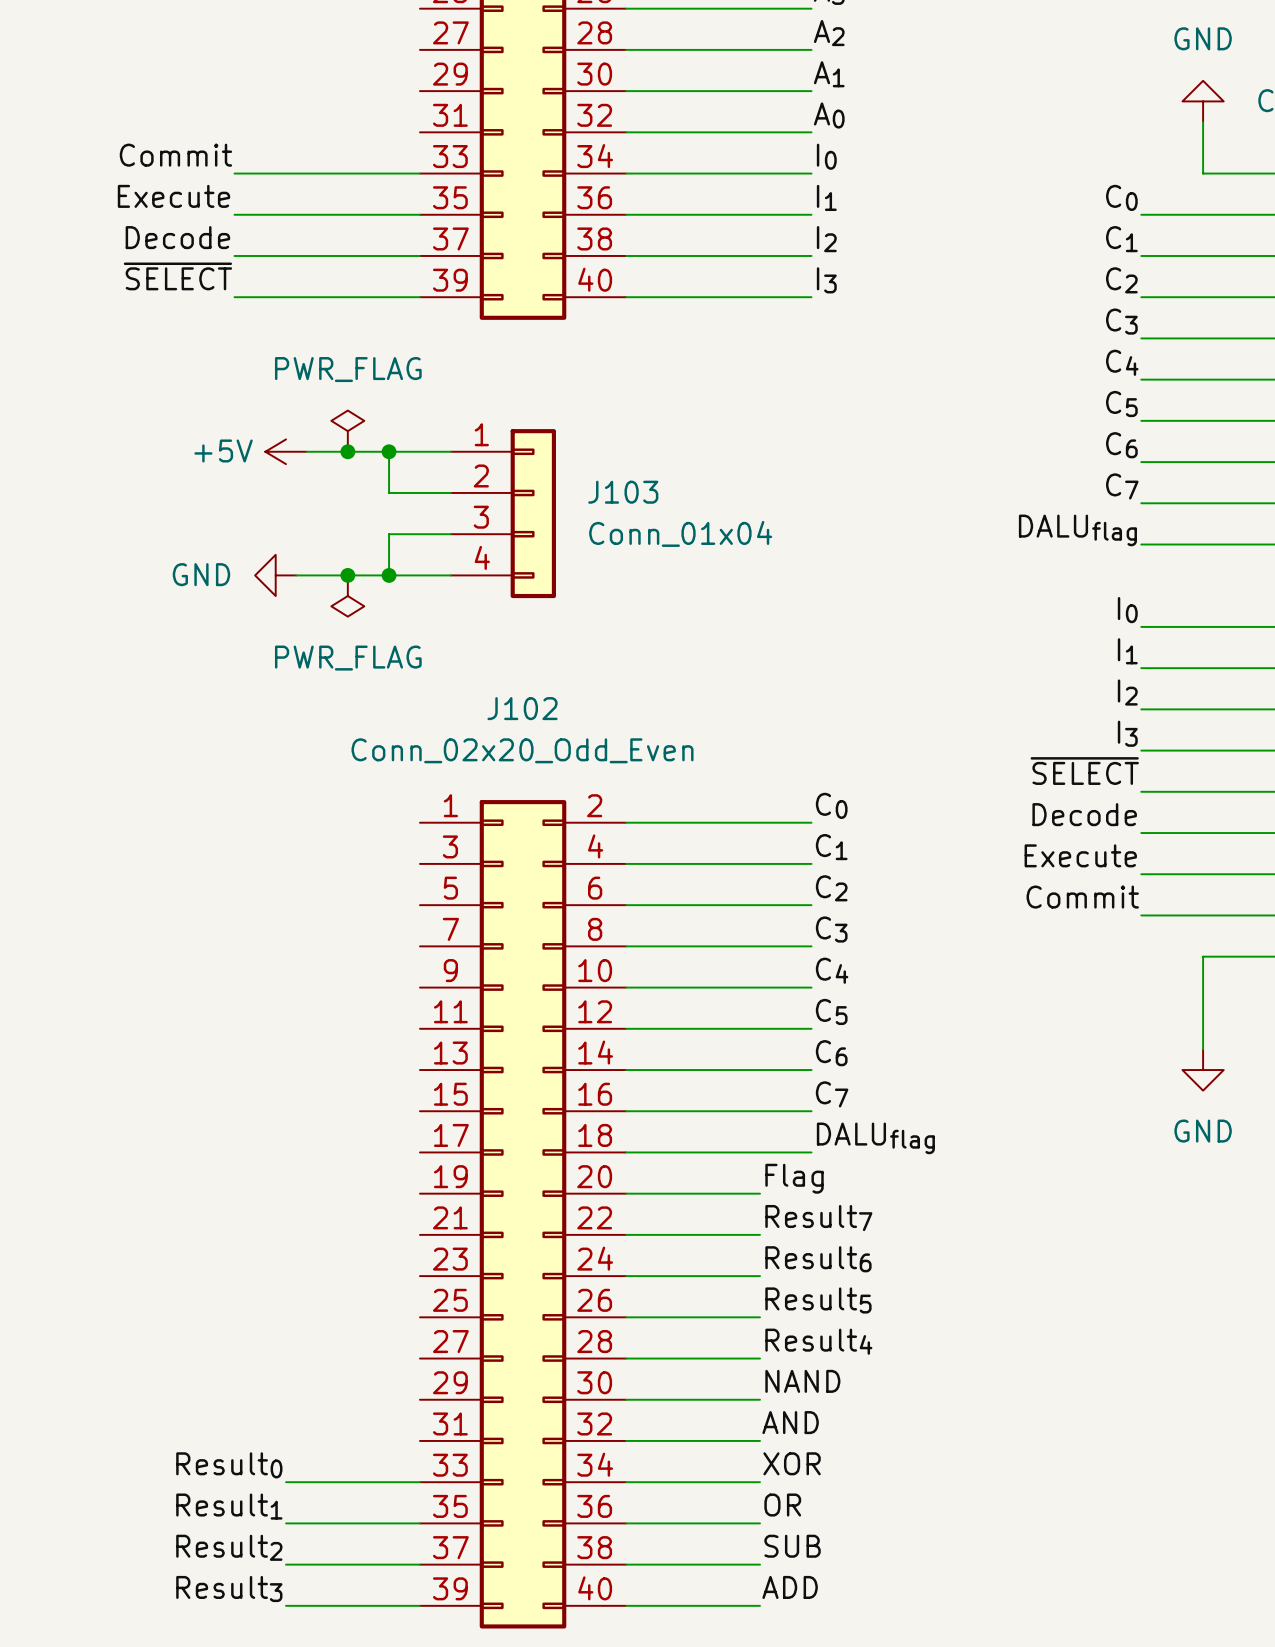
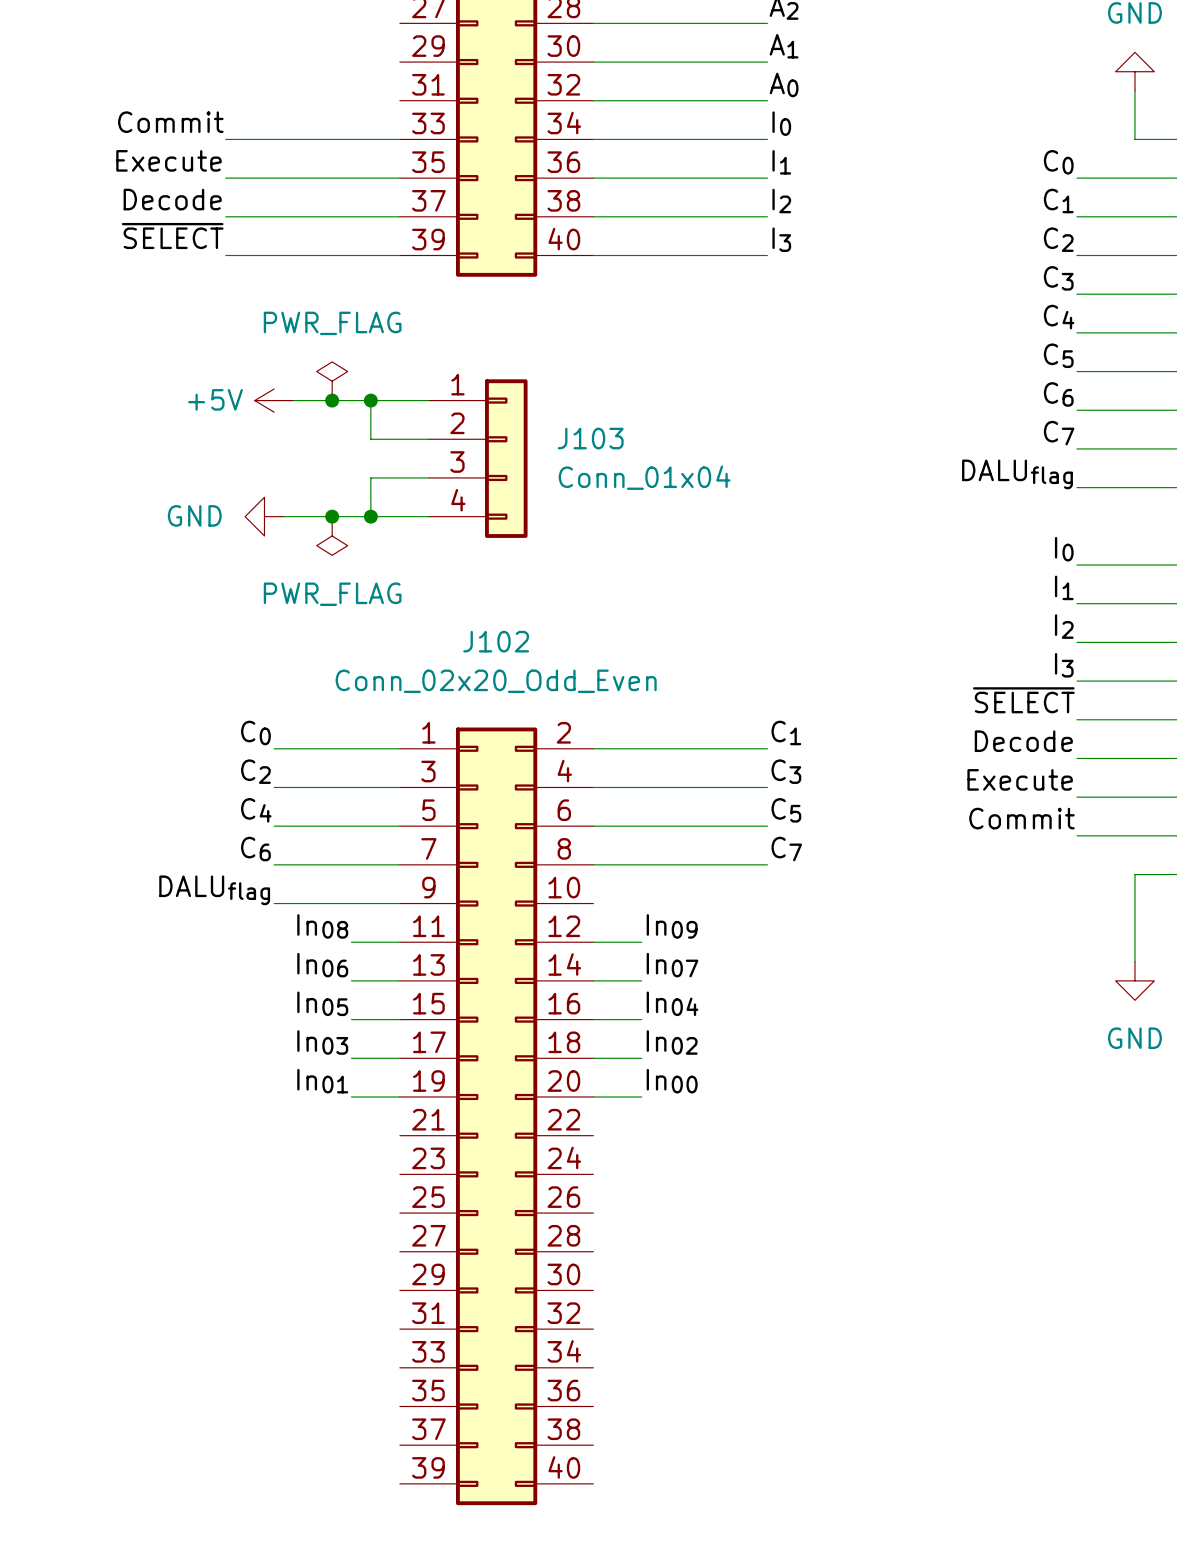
label: none -> C0 (255, 732)
label: C0 (831, 805) -> C1 (786, 732)
wire: none -> (274, 748) (399, 748)
label: none -> C2 (255, 771)
label: C1 (831, 847) -> C3 (786, 771)
wire: none -> (274, 787) (399, 787)
label: none -> C4 (256, 810)
label: C2 (831, 888) -> C5 (786, 810)
wire: none -> (274, 826) (399, 826)
label: none -> C6 (255, 849)
label: C3 (831, 929) -> C7 (786, 849)
label: C4 (832, 970) -> none
label: none -> DALUflag (214, 890)
wire: (626, 987) (811, 987) -> none
label: none -> In08 (322, 926)
label: none -> In09 (672, 926)
label: C5 (831, 1011) -> none
wire: none -> (351, 942) (399, 942)
wire: (677, 1028) (811, 1028) -> (274, 864) (399, 864)
label: none -> In06 (322, 965)
label: C6 (831, 1053) -> none
wire: none -> (351, 980) (399, 980)
wire: (677, 1070) (811, 1070) -> (274, 903) (399, 903)
label: none -> In05 (322, 1003)
label: none -> In04 (672, 1003)
label: C7 (832, 1094) -> In07 (672, 965)
wire: none -> (351, 1019) (399, 1019)
wire: (677, 1111) (811, 1111) -> none
label: none -> In03 (322, 1042)
label: none -> In02 (672, 1042)
label: DALUflag (875, 1138) -> none
wire: none -> (351, 1058) (399, 1058)
wire: (677, 1152) (811, 1152) -> none
label: none -> In01 (322, 1081)
label: none -> In00 (672, 1081)
label: Flag (794, 1178) -> none
wire: none -> (351, 1096) (399, 1096)
wire: (677, 1193) (760, 1193) -> none
label: Result7 (818, 1218) -> none
wire: (626, 1234) (760, 1234) -> none
label: Result6 (818, 1259) -> none
wire: (626, 1276) (760, 1276) -> none
label: Result5 (818, 1300) -> none
wire: (626, 1317) (760, 1317) -> none
label: Result4 (818, 1341) -> none
wire: (626, 1358) (760, 1358) -> none
label: NAND (802, 1381) -> none
wire: (626, 1399) (760, 1399) -> none
label: AND (790, 1422) -> none
wire: (626, 1440) (760, 1440) -> none
label: XOR (792, 1463) -> none
label: Result0 (229, 1465) -> none
wire: (286, 1482) (419, 1482) -> none
wire: (626, 1482) (760, 1482) -> none
label: OR (782, 1505) -> none
label: Result1 (229, 1506) -> none
wire: (286, 1523) (419, 1523) -> none
wire: (626, 1523) (760, 1523) -> none
label: SUB (792, 1546) -> none
label: Result2 (229, 1547) -> none
wire: (286, 1564) (419, 1564) -> none
wire: (626, 1564) (760, 1564) -> none
label: ADD (790, 1587) -> none
label: Result3 (229, 1589) -> none
wire: (286, 1605) (419, 1605) -> none
wire: (626, 1605) (760, 1605) -> none

